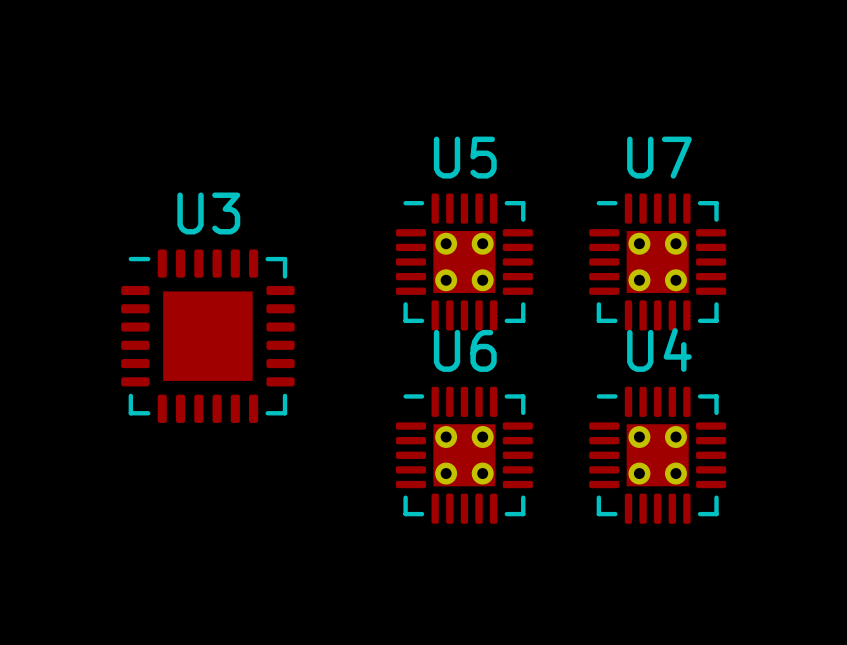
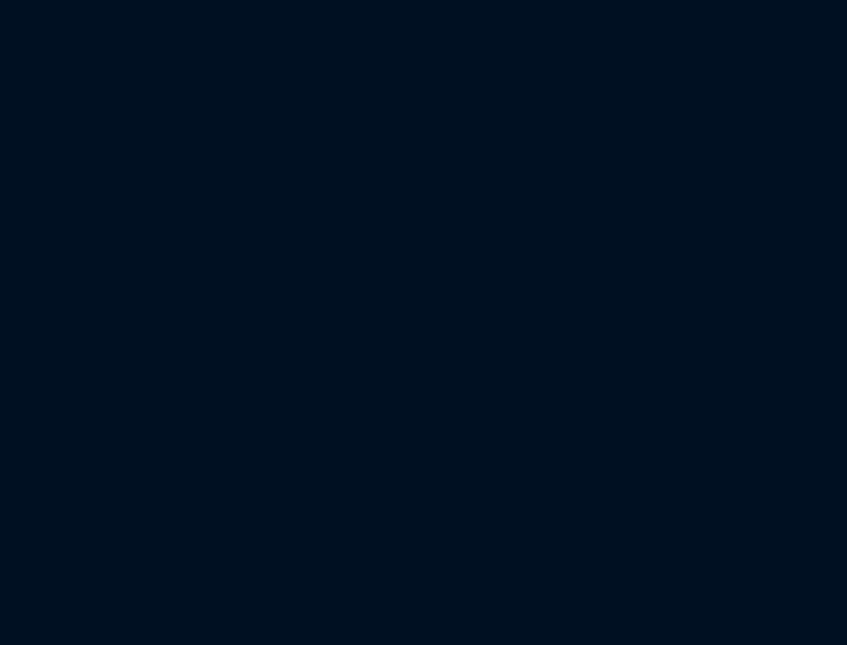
U5: (464, 262) -> none
U7: (657, 262) -> none
U3: (207, 336) -> none
U6: (464, 455) -> none
U4: (657, 455) -> none

